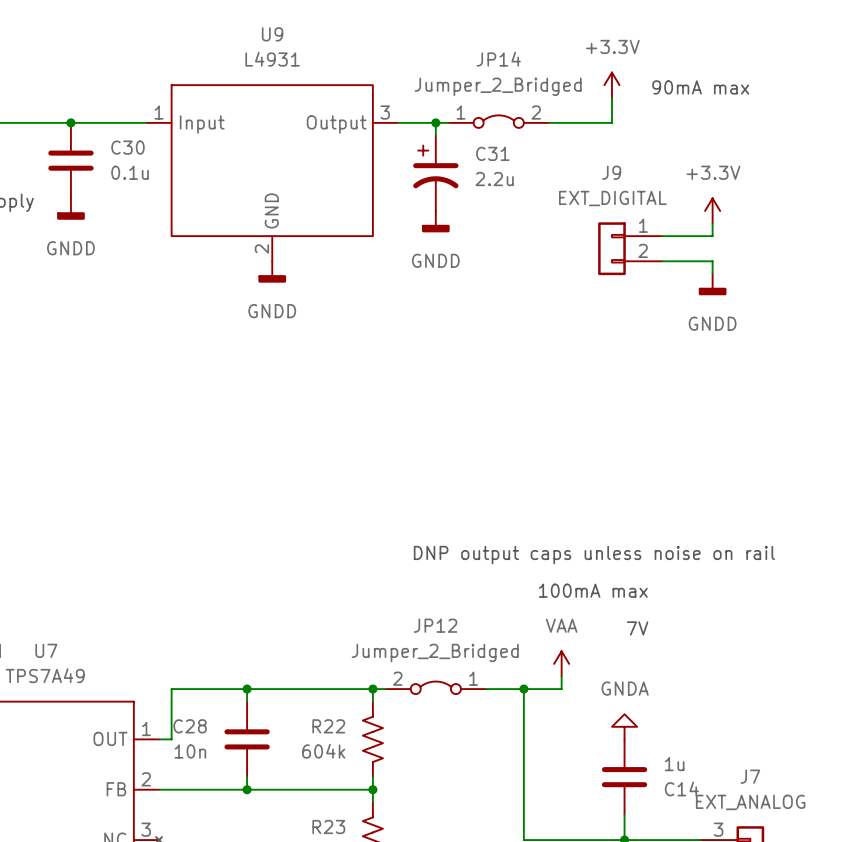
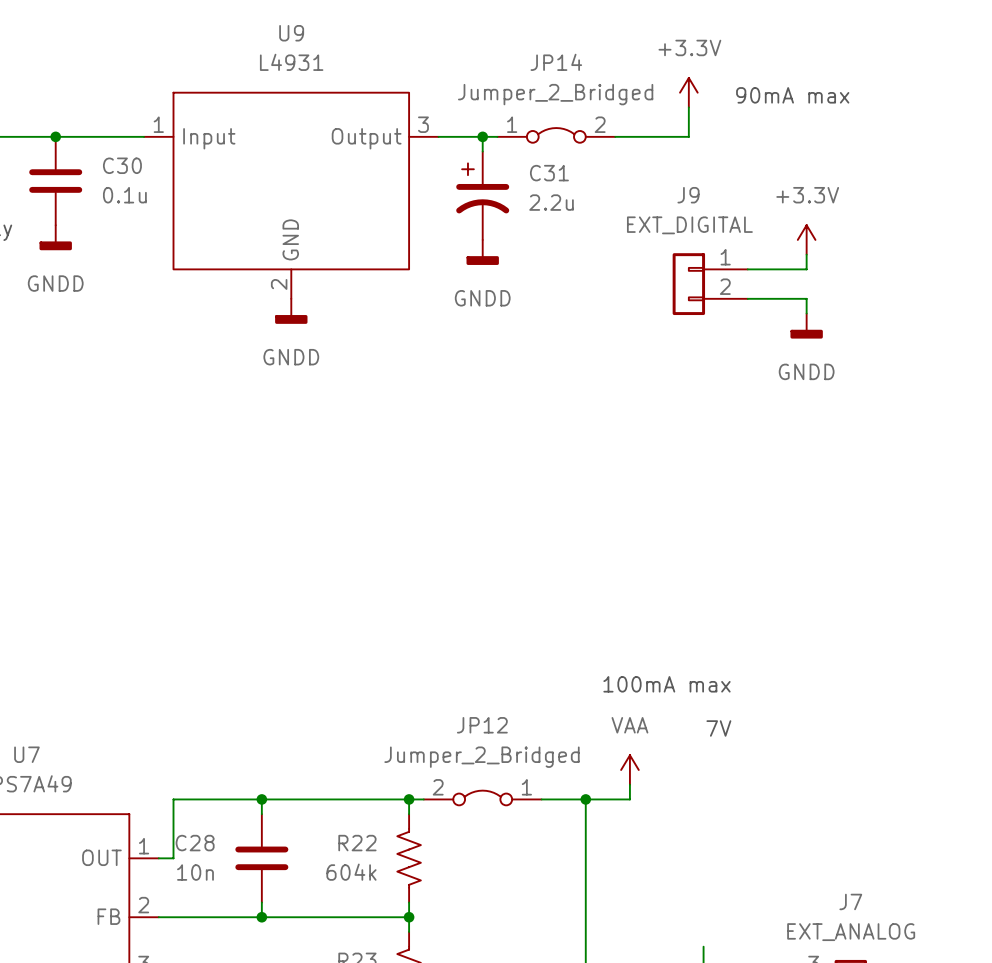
text: DNP output caps unless noise on rail (594, 555) -> none
power symbol: GNDA (624, 726) -> none
C14: 1u (624, 777) -> none

